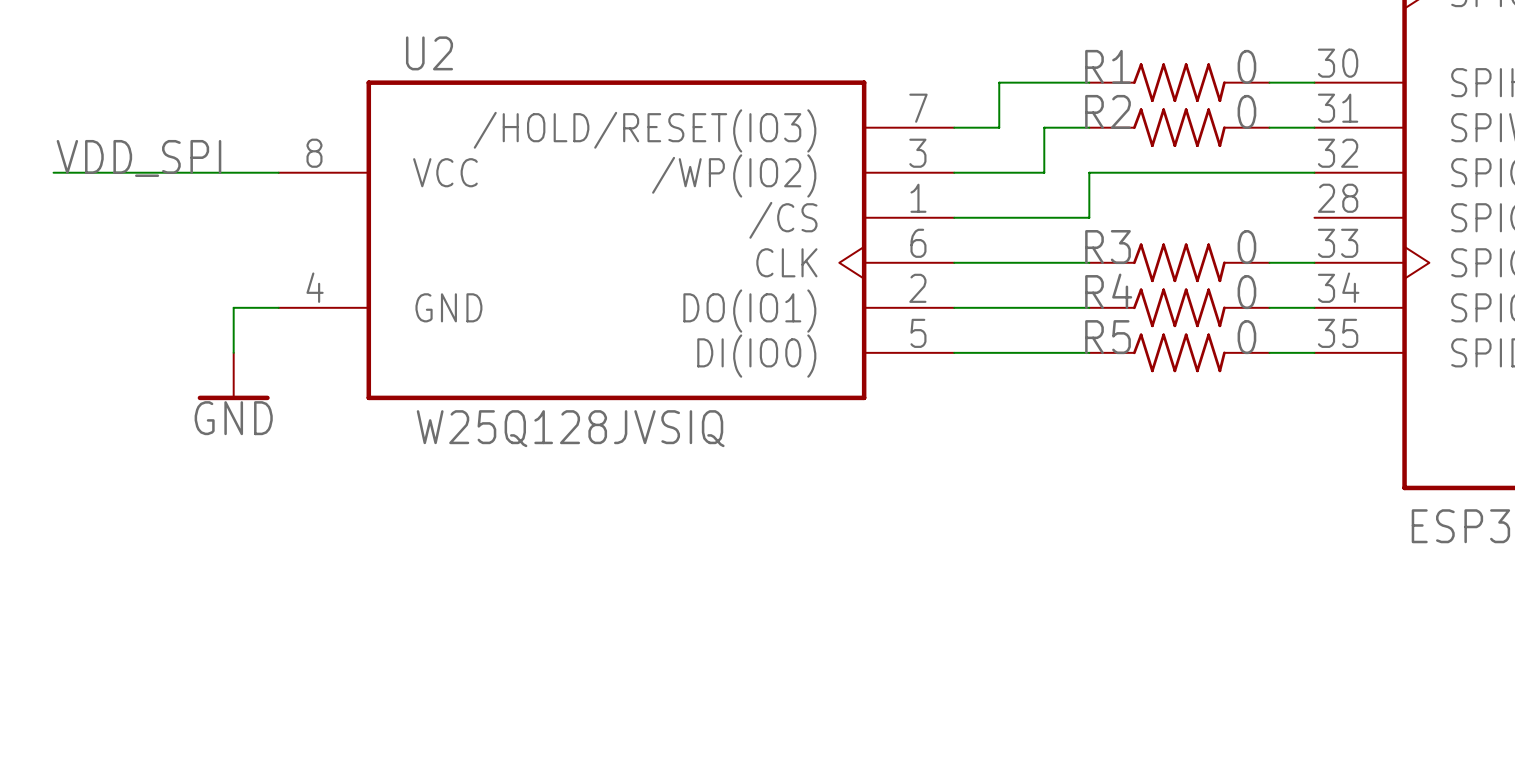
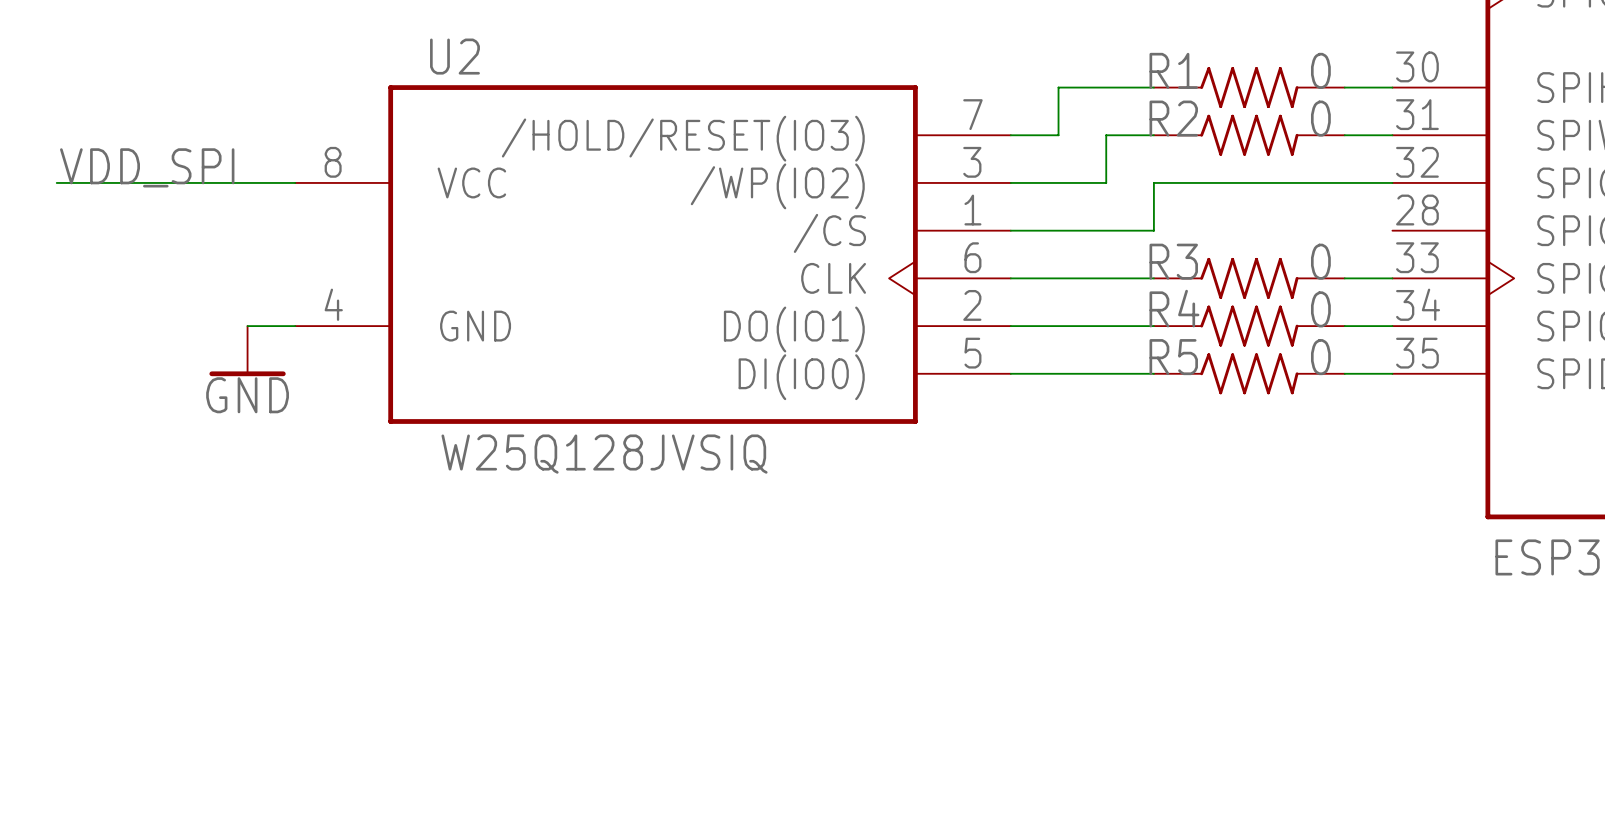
power symbol position: GND (233, 376) -> GND (247, 351)

